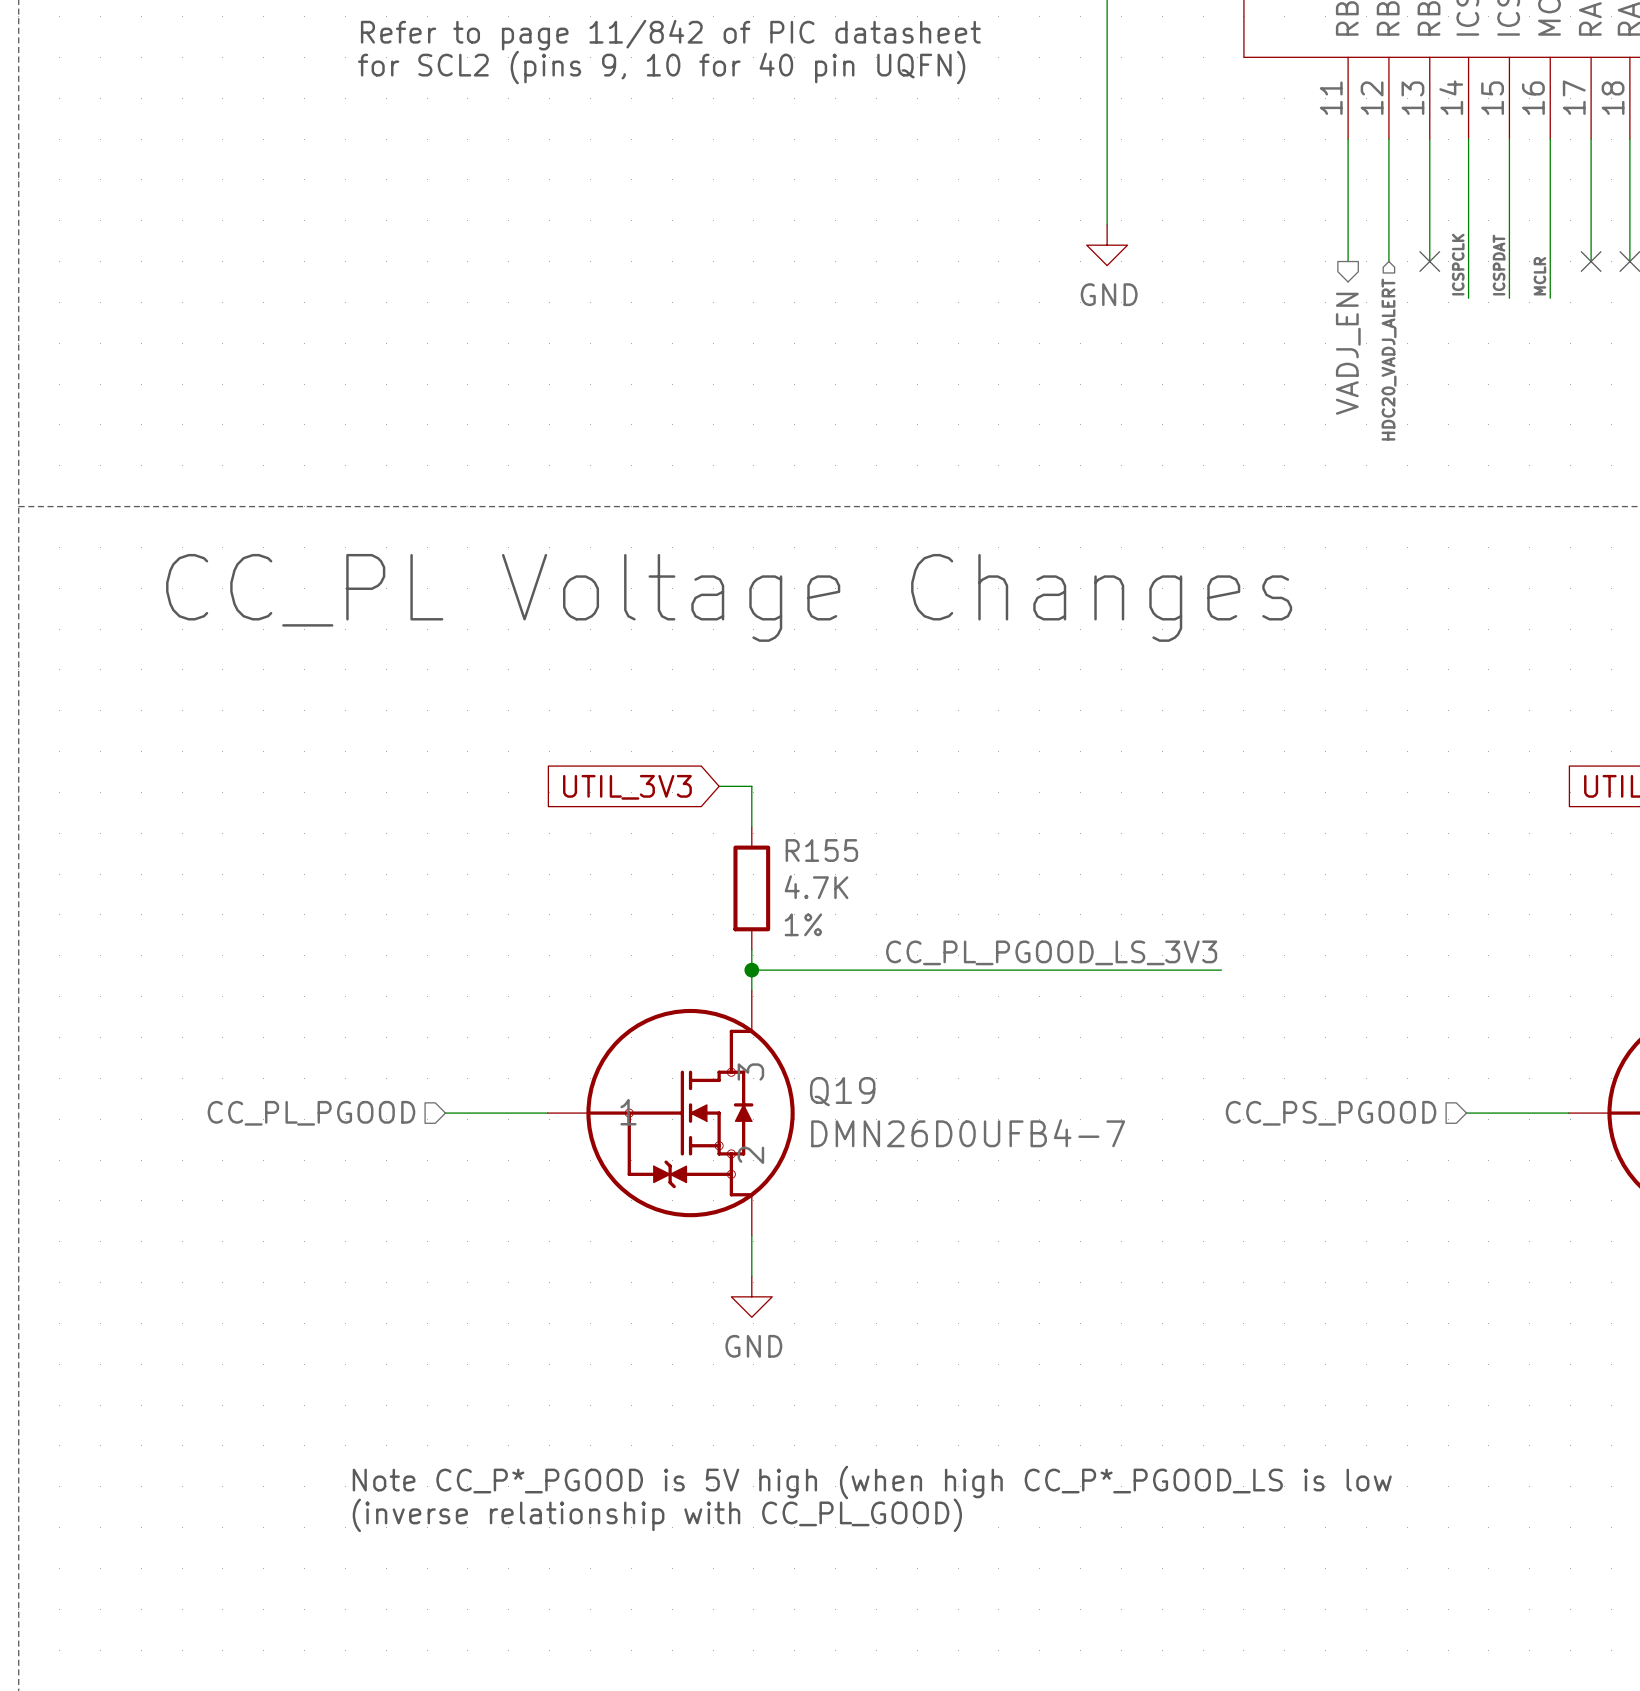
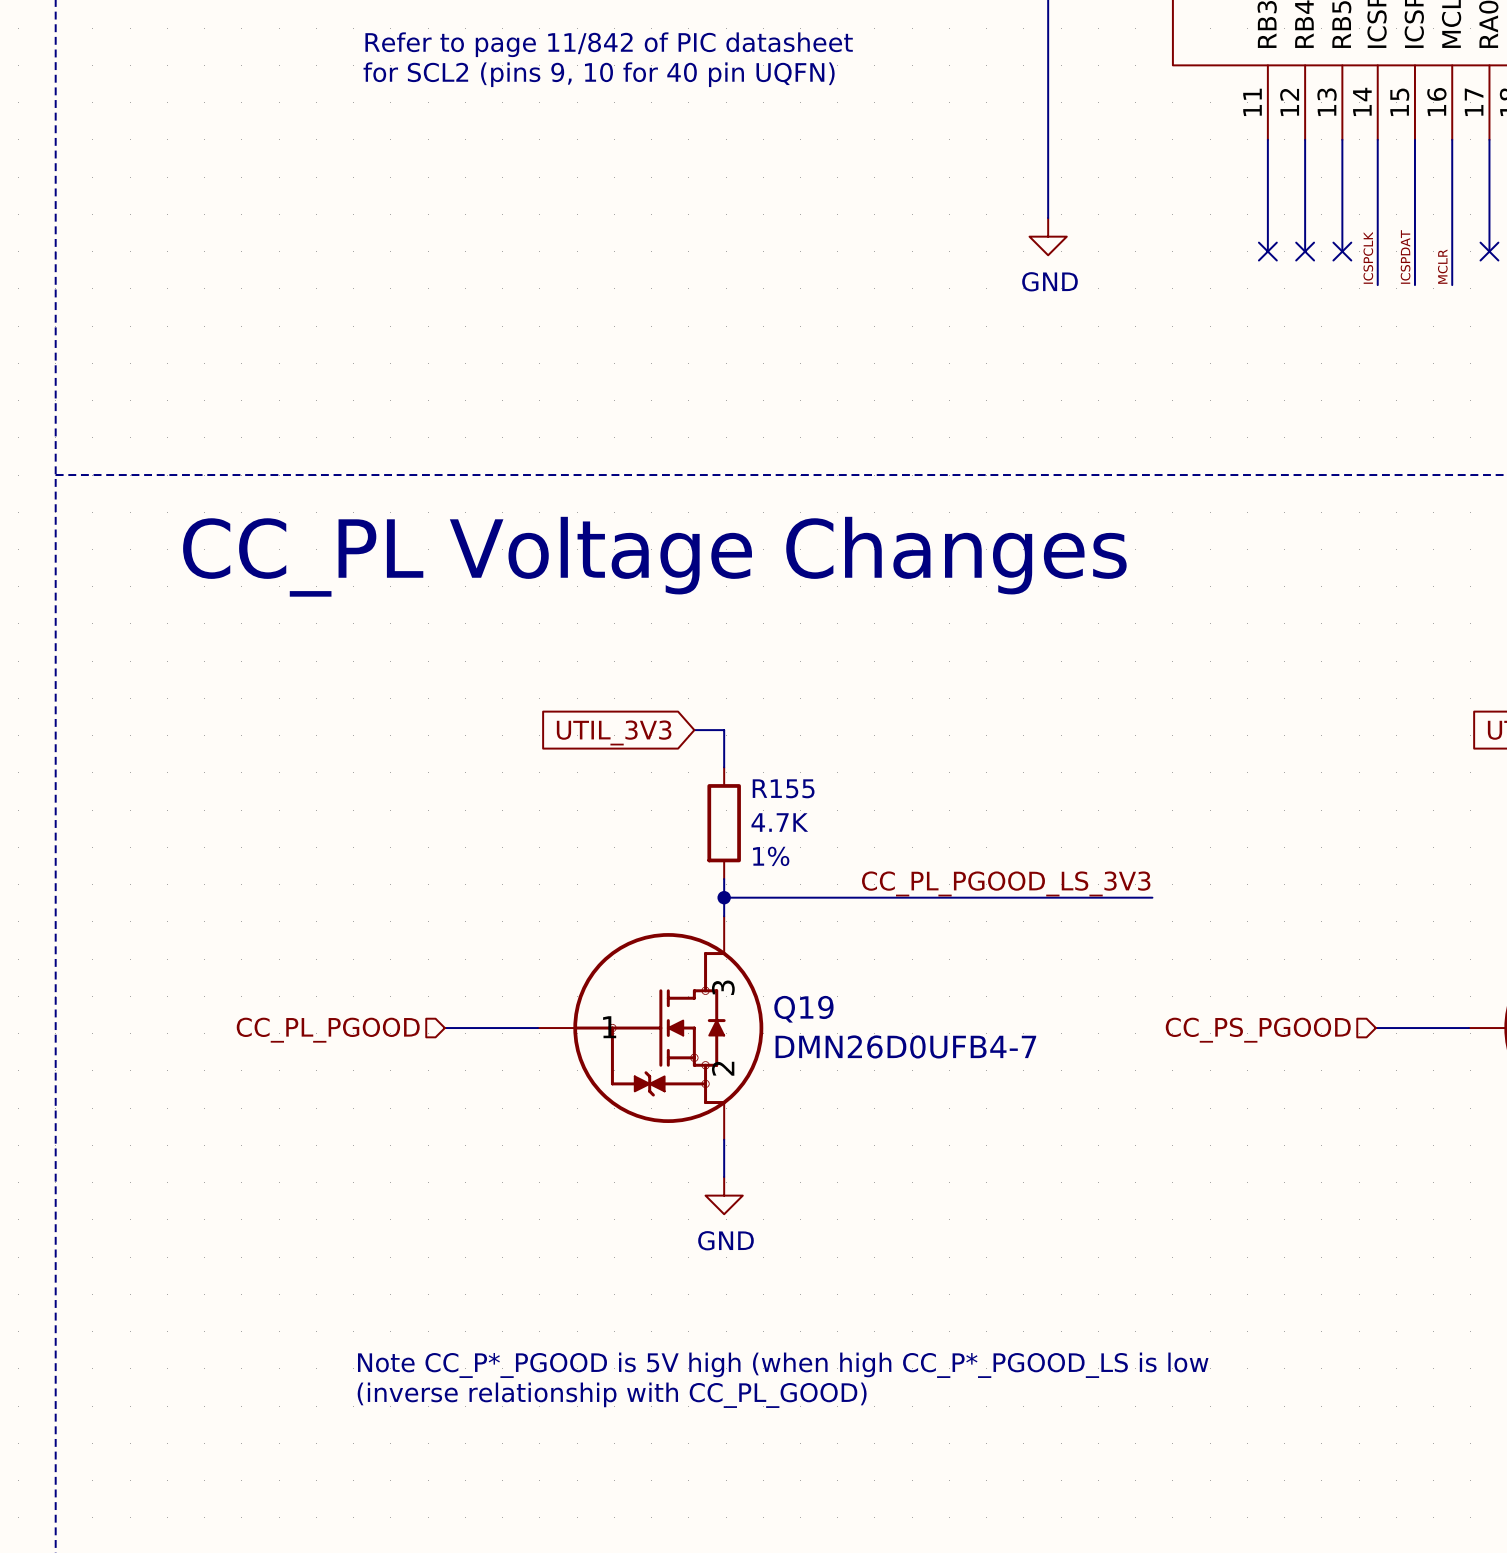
no-connect mark: none -> (1267, 251)
no-connect mark: none -> (1305, 251)
hierarchical label: VADJ_EN (1348, 353) -> none
hierarchical label: HDC20_VADJ_ALERT (1389, 359) -> none

